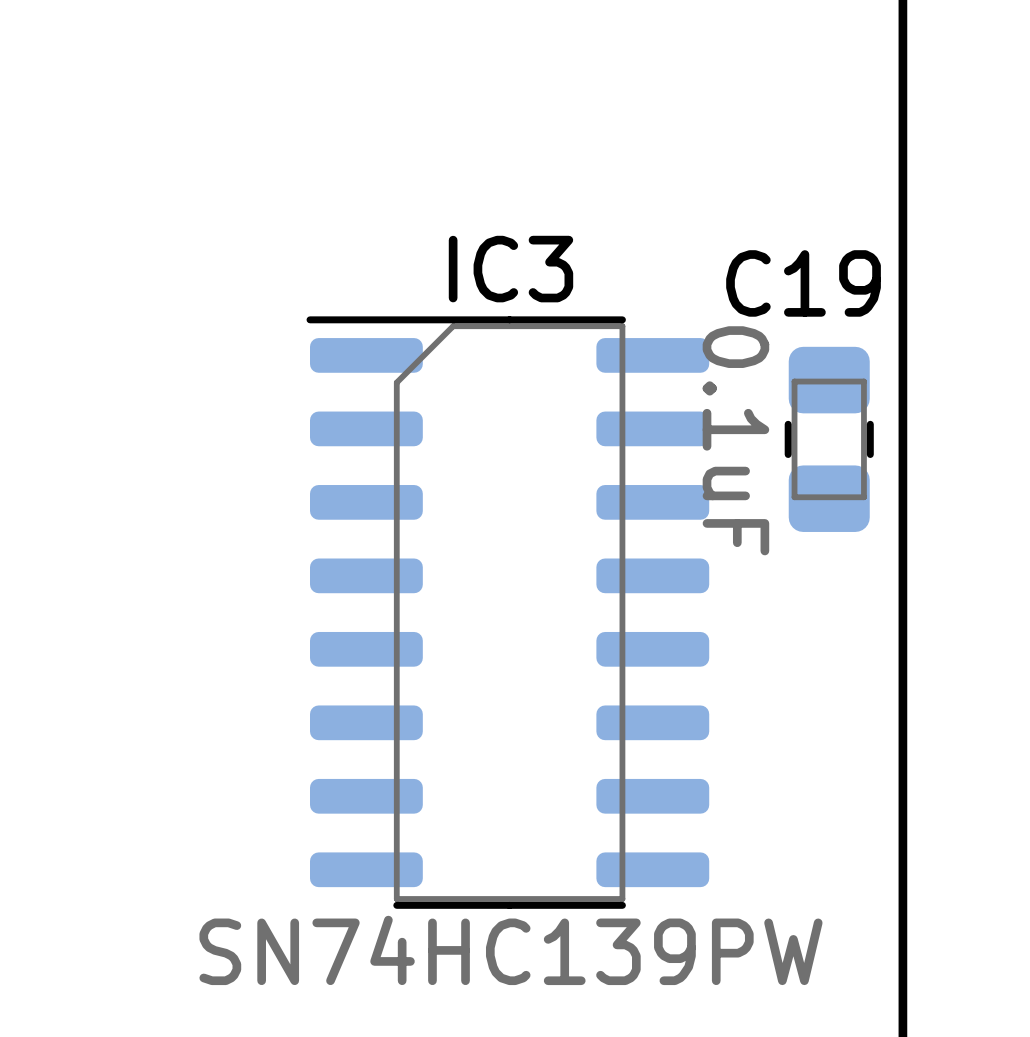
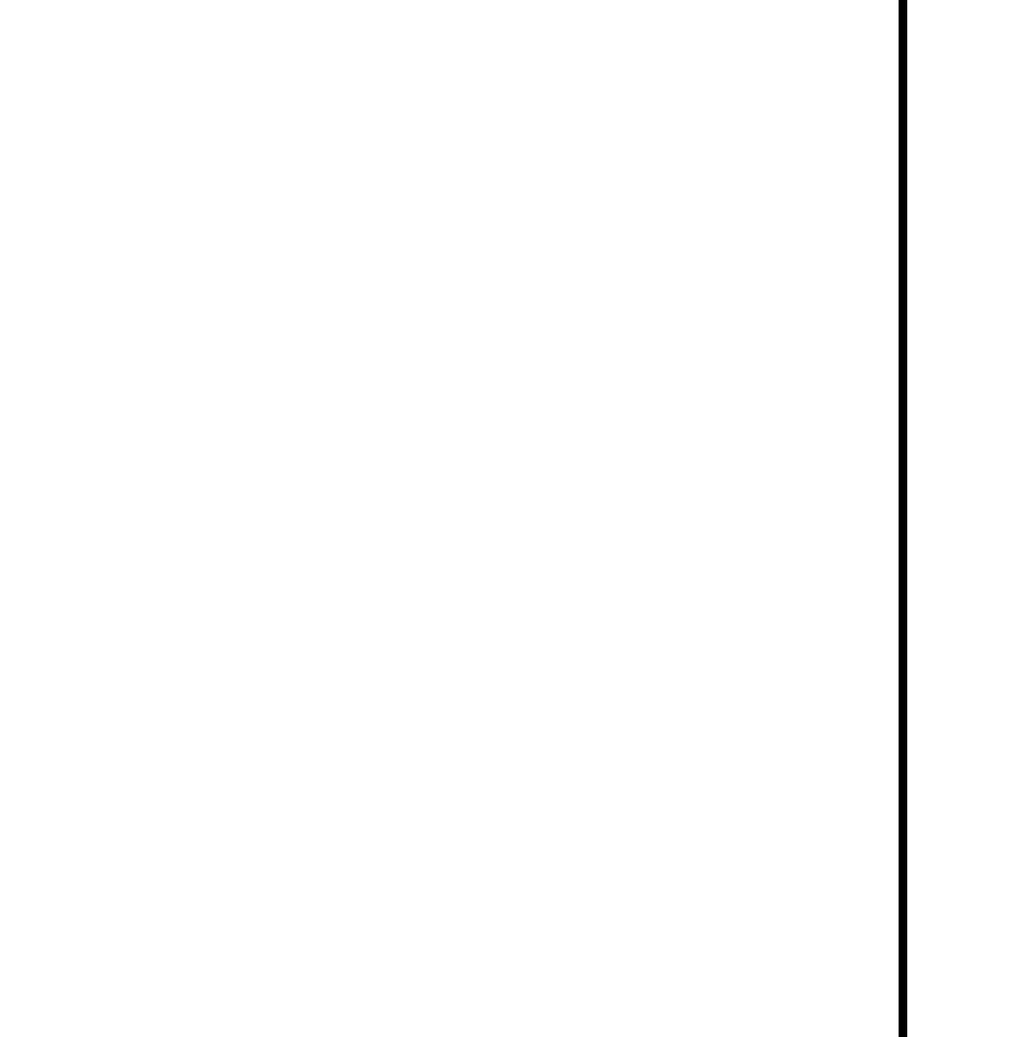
C19: 0.1uF (829, 439) -> none
IC3: SN74HC139PW (507, 612) -> none

